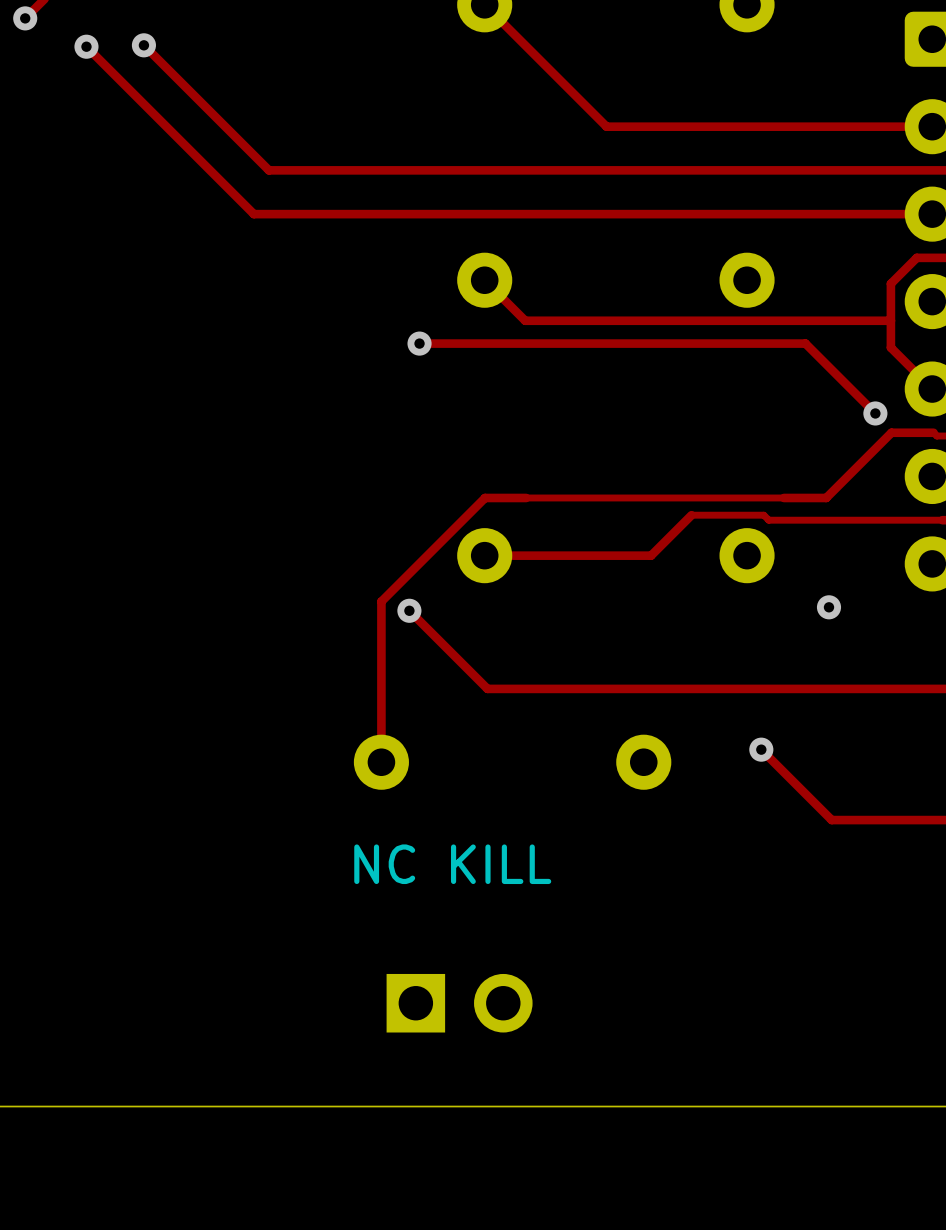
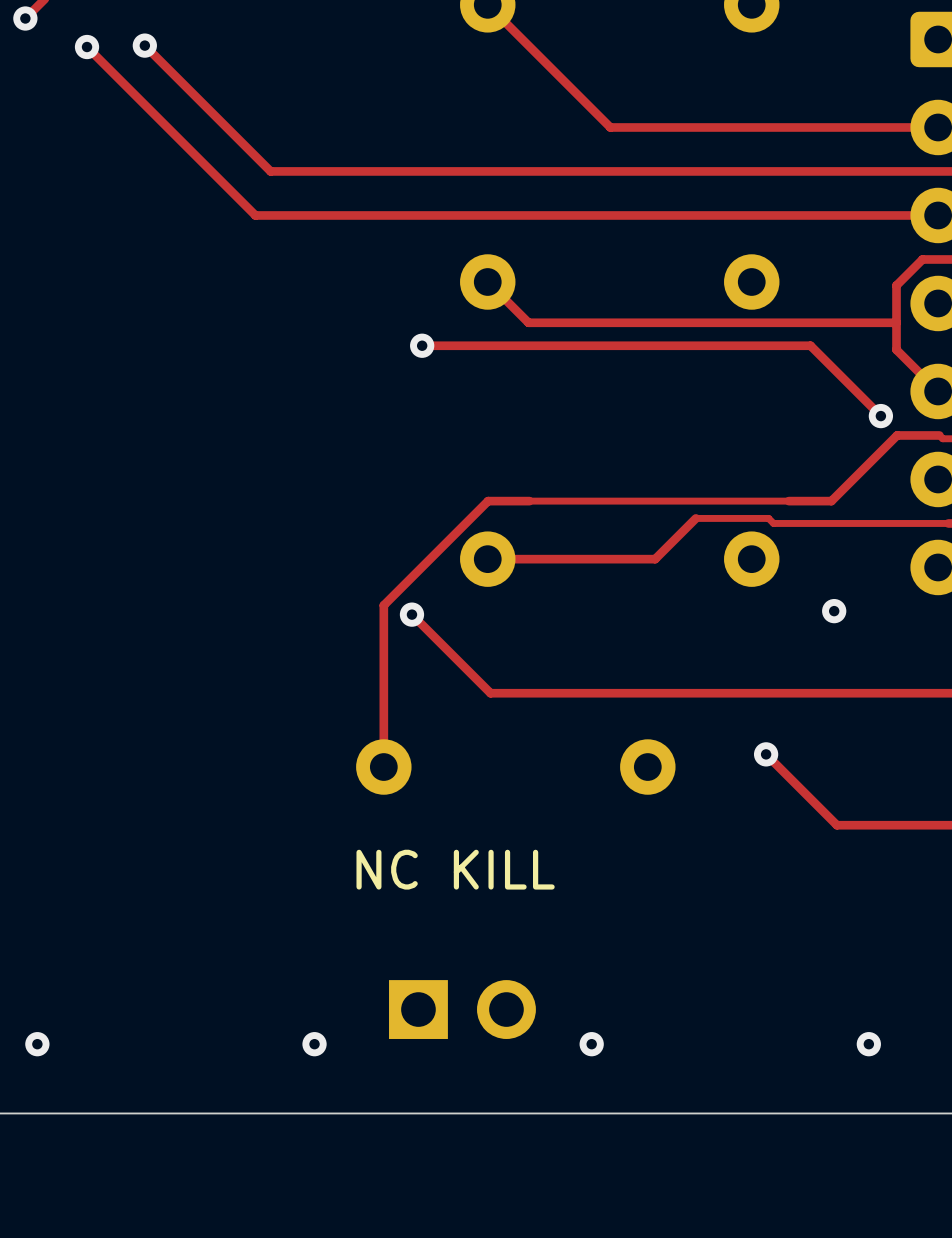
via: none -> (37, 1044)
via: none -> (314, 1044)
via: none -> (591, 1044)
via: none -> (868, 1044)

